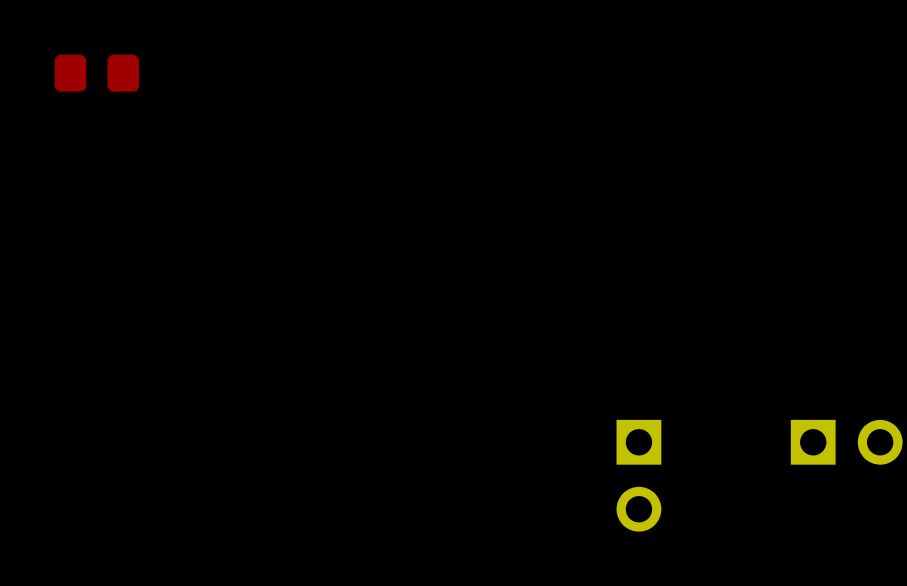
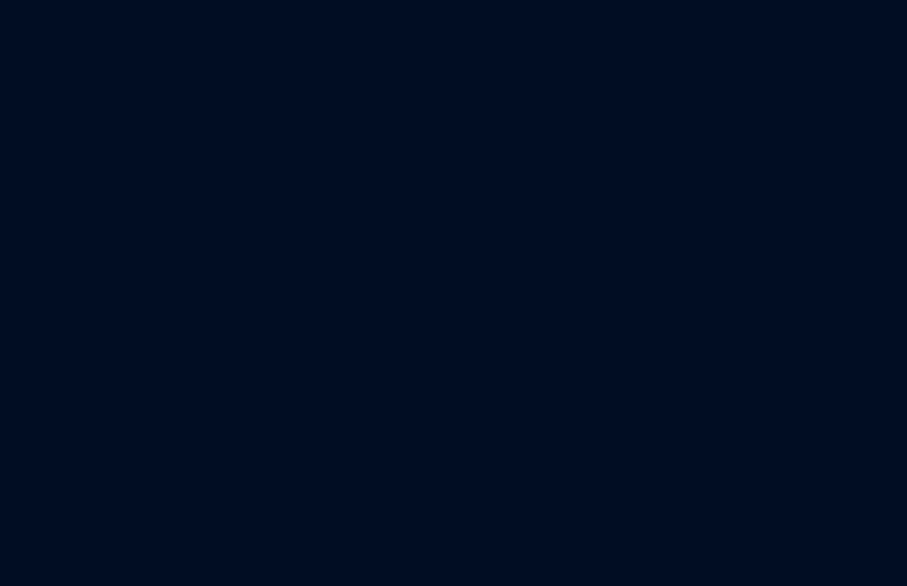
part: (96, 73) -> none
part: (846, 442) -> none
part: (638, 475) -> none

